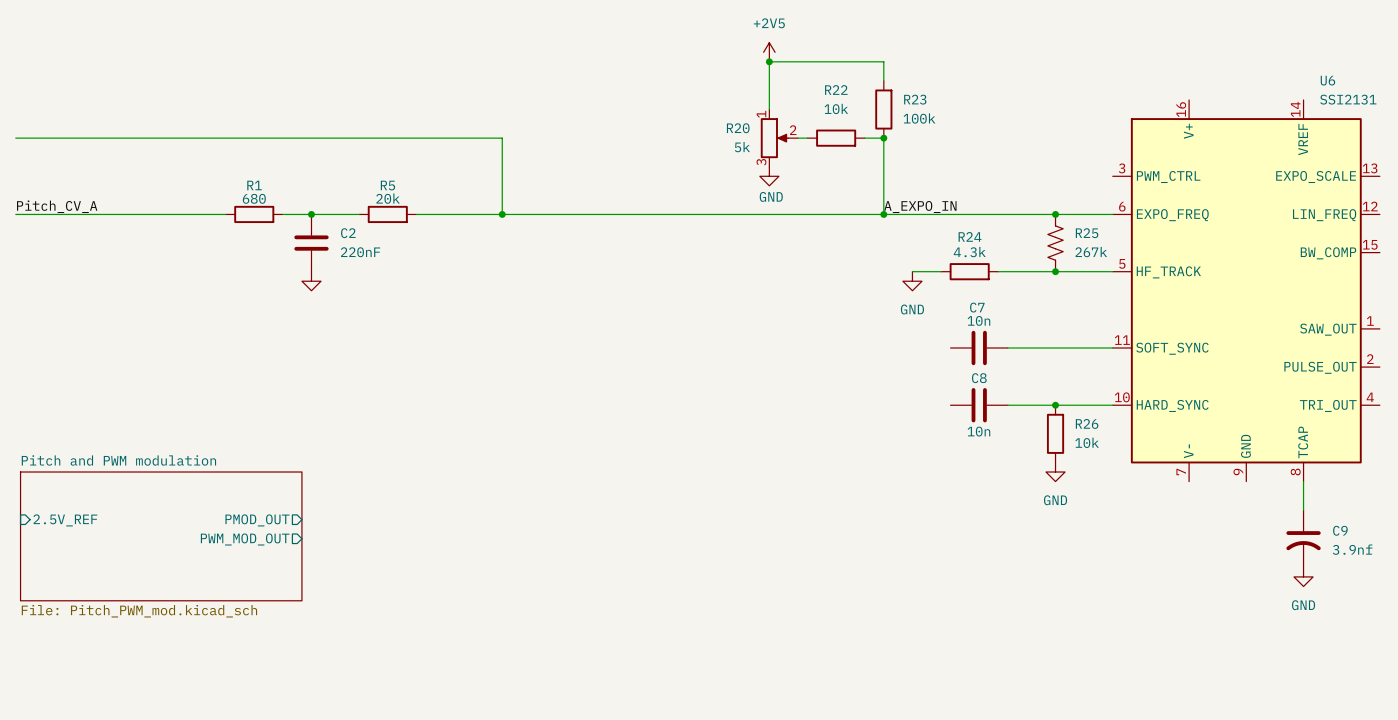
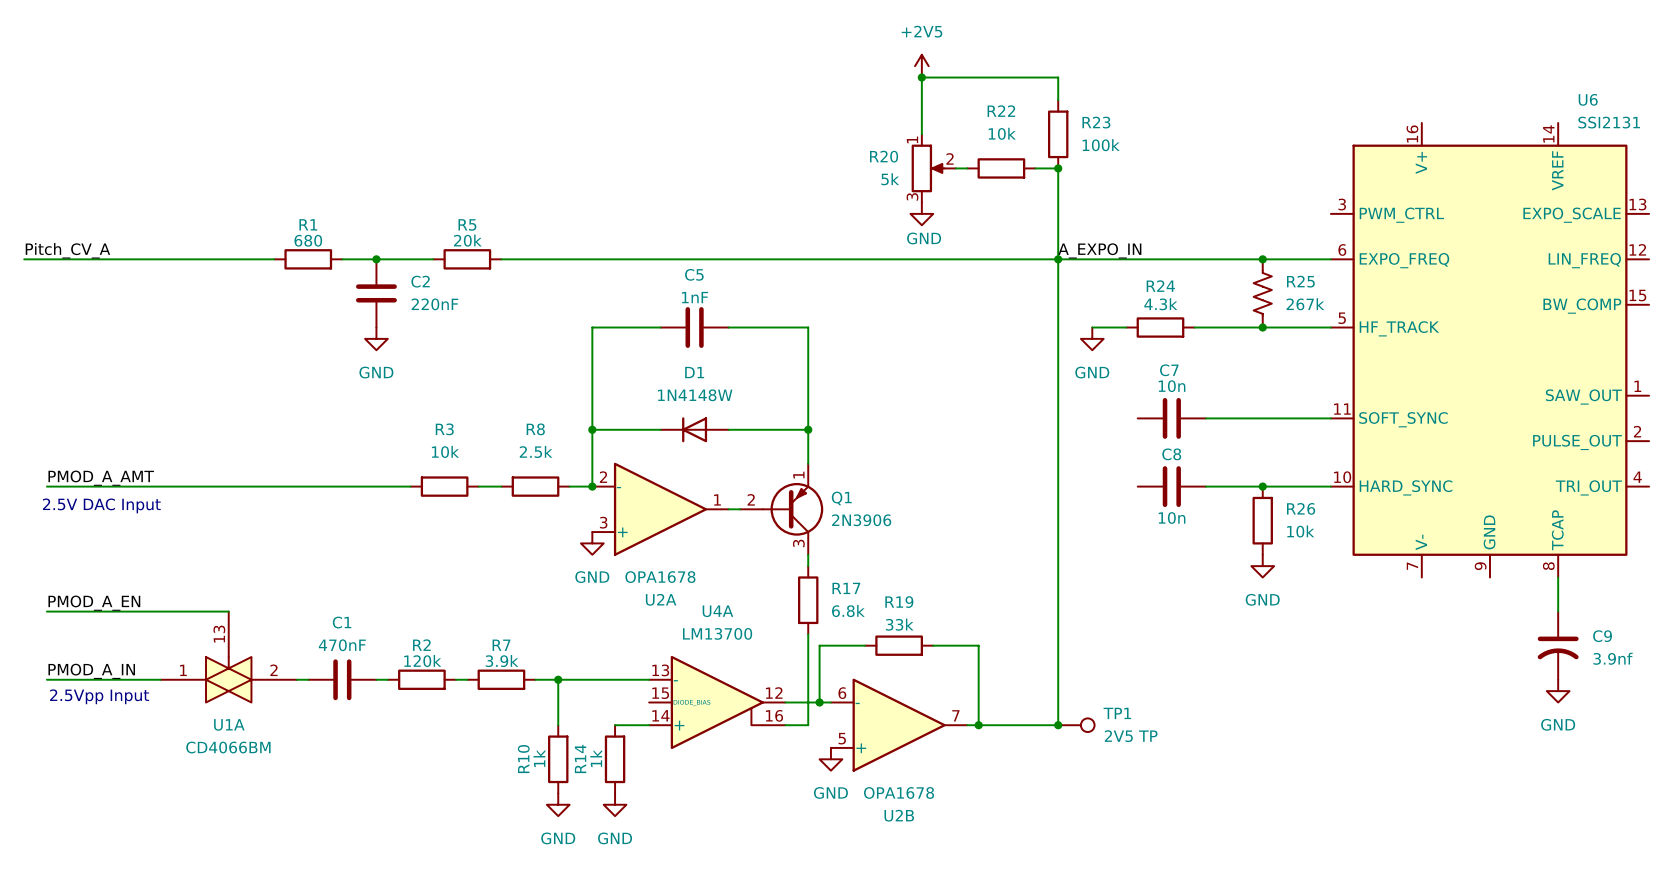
wire: (15, 138) (502, 138) (502, 214) -> none
junction: (502, 214) -> none
wire: none -> (1058, 259) (1058, 725) (967, 725)
wire: none -> (660, 327) (592, 327) (592, 486) (569, 486)
C5: none -> 1nF (694, 327)
wire: none -> (728, 327) (808, 327) (808, 463)
power symbol text: none -> GND (376, 372)
wire: none -> (592, 429) (660, 429)
junction: none -> (592, 429)
D1: none -> 1N4148W (694, 429)
wire: none -> (728, 429) (808, 429)
junction: none -> (808, 429)
label: none -> PMOD_A_AMT (101, 478)
wire: none -> (46, 486) (410, 486)
R3: none -> 10k (444, 486)
wire: none -> (478, 486) (501, 486)
R8: none -> 2.5k (535, 486)
junction: none -> (592, 486)
text: none -> 2.5V DAC Input (101, 505)
U2A: none -> OPA1678 (660, 509)
wire: none -> (728, 509) (740, 509)
Q1: none -> 2N3906 (781, 509)
power symbol: none -> GND (592, 543)
wire: none -> (808, 554) (808, 566)
R17: none -> 6.8k (808, 600)
label: none -> PMOD_A_EN (94, 603)
wire: none -> (46, 611) (228, 611)
sheet pin: 2.5V_REF (65, 520) -> none
sheet pin: PMOD_OUT (257, 520) -> none
wire: none -> (808, 634) (808, 725) (785, 725)
sheet Pitch and PWM modulation: File: Pitch_PWM_mod.kicad_sch (161, 536) -> none
wire: none -> (865, 645) (819, 645) (819, 702)
R19: none -> 33k (899, 645)
wire: none -> (933, 645) (978, 645) (978, 725)
sheet pin: PWM_MOD_OUT (245, 539) -> none
U1A: none -> CD4066BM (228, 657)
label: none -> PMOD_A_IN (91, 671)
wire: none -> (46, 679) (160, 679)
wire: none -> (296, 679) (308, 679)
C1: none -> 470nF (342, 679)
wire: none -> (376, 679) (387, 679)
R2: none -> 120k (421, 679)
wire: none -> (455, 679) (467, 679)
R7: none -> 3.9k (501, 679)
wire: none -> (535, 679) (649, 679)
wire: none -> (558, 679) (558, 725)
junction: none -> (558, 679)
text: none -> 2.5Vpp Input (99, 696)
U4A: none -> LM13700 (717, 702)
wire: none -> (785, 702) (830, 702)
junction: none -> (819, 702)
wire: none -> (615, 725) (649, 725)
U2B: none -> OPA1678 (899, 725)
junction: none -> (978, 725)
junction: none -> (1058, 725)
TP1: none -> 2V5 TP (1076, 725)
R10: none -> 1k (558, 759)
R14: none -> 1k (615, 759)
power symbol: none -> GND (830, 759)
power symbol: none -> GND (558, 804)
power symbol: none -> GND (615, 804)

